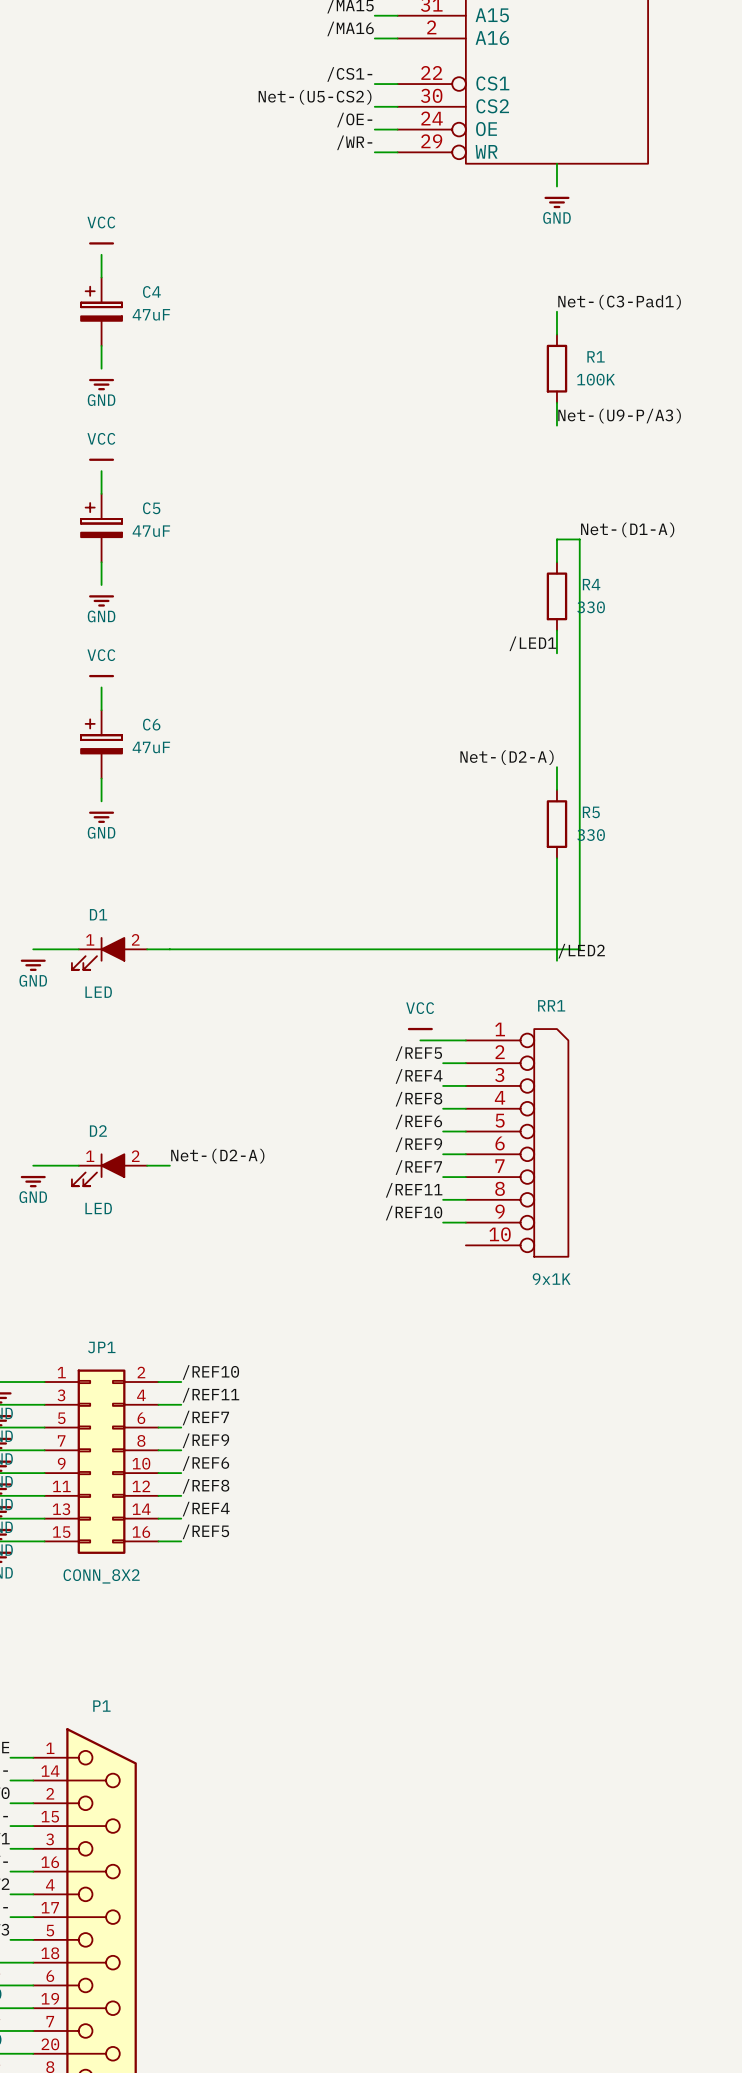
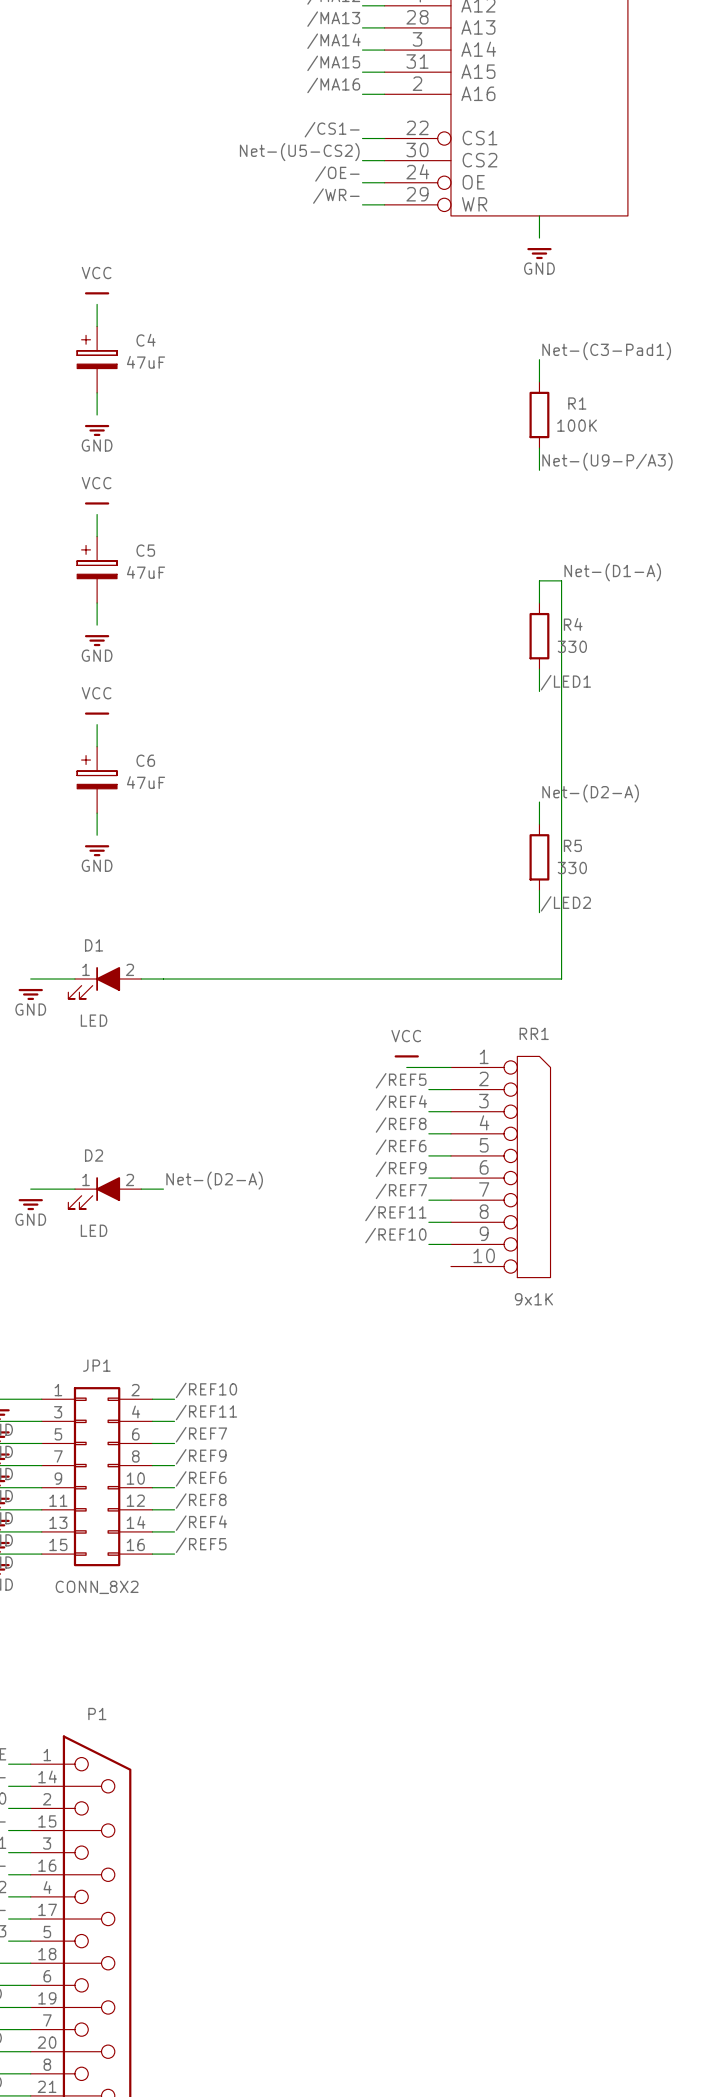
label position: /LED1 (532, 643) -> /LED1 (565, 682)
label position: Net-(D2-A) (507, 757) -> Net-(D2-A) (590, 793)
wire: (556, 881) (556, 960) -> none
label position: /LED2 (581, 951) -> /LED2 (565, 903)

